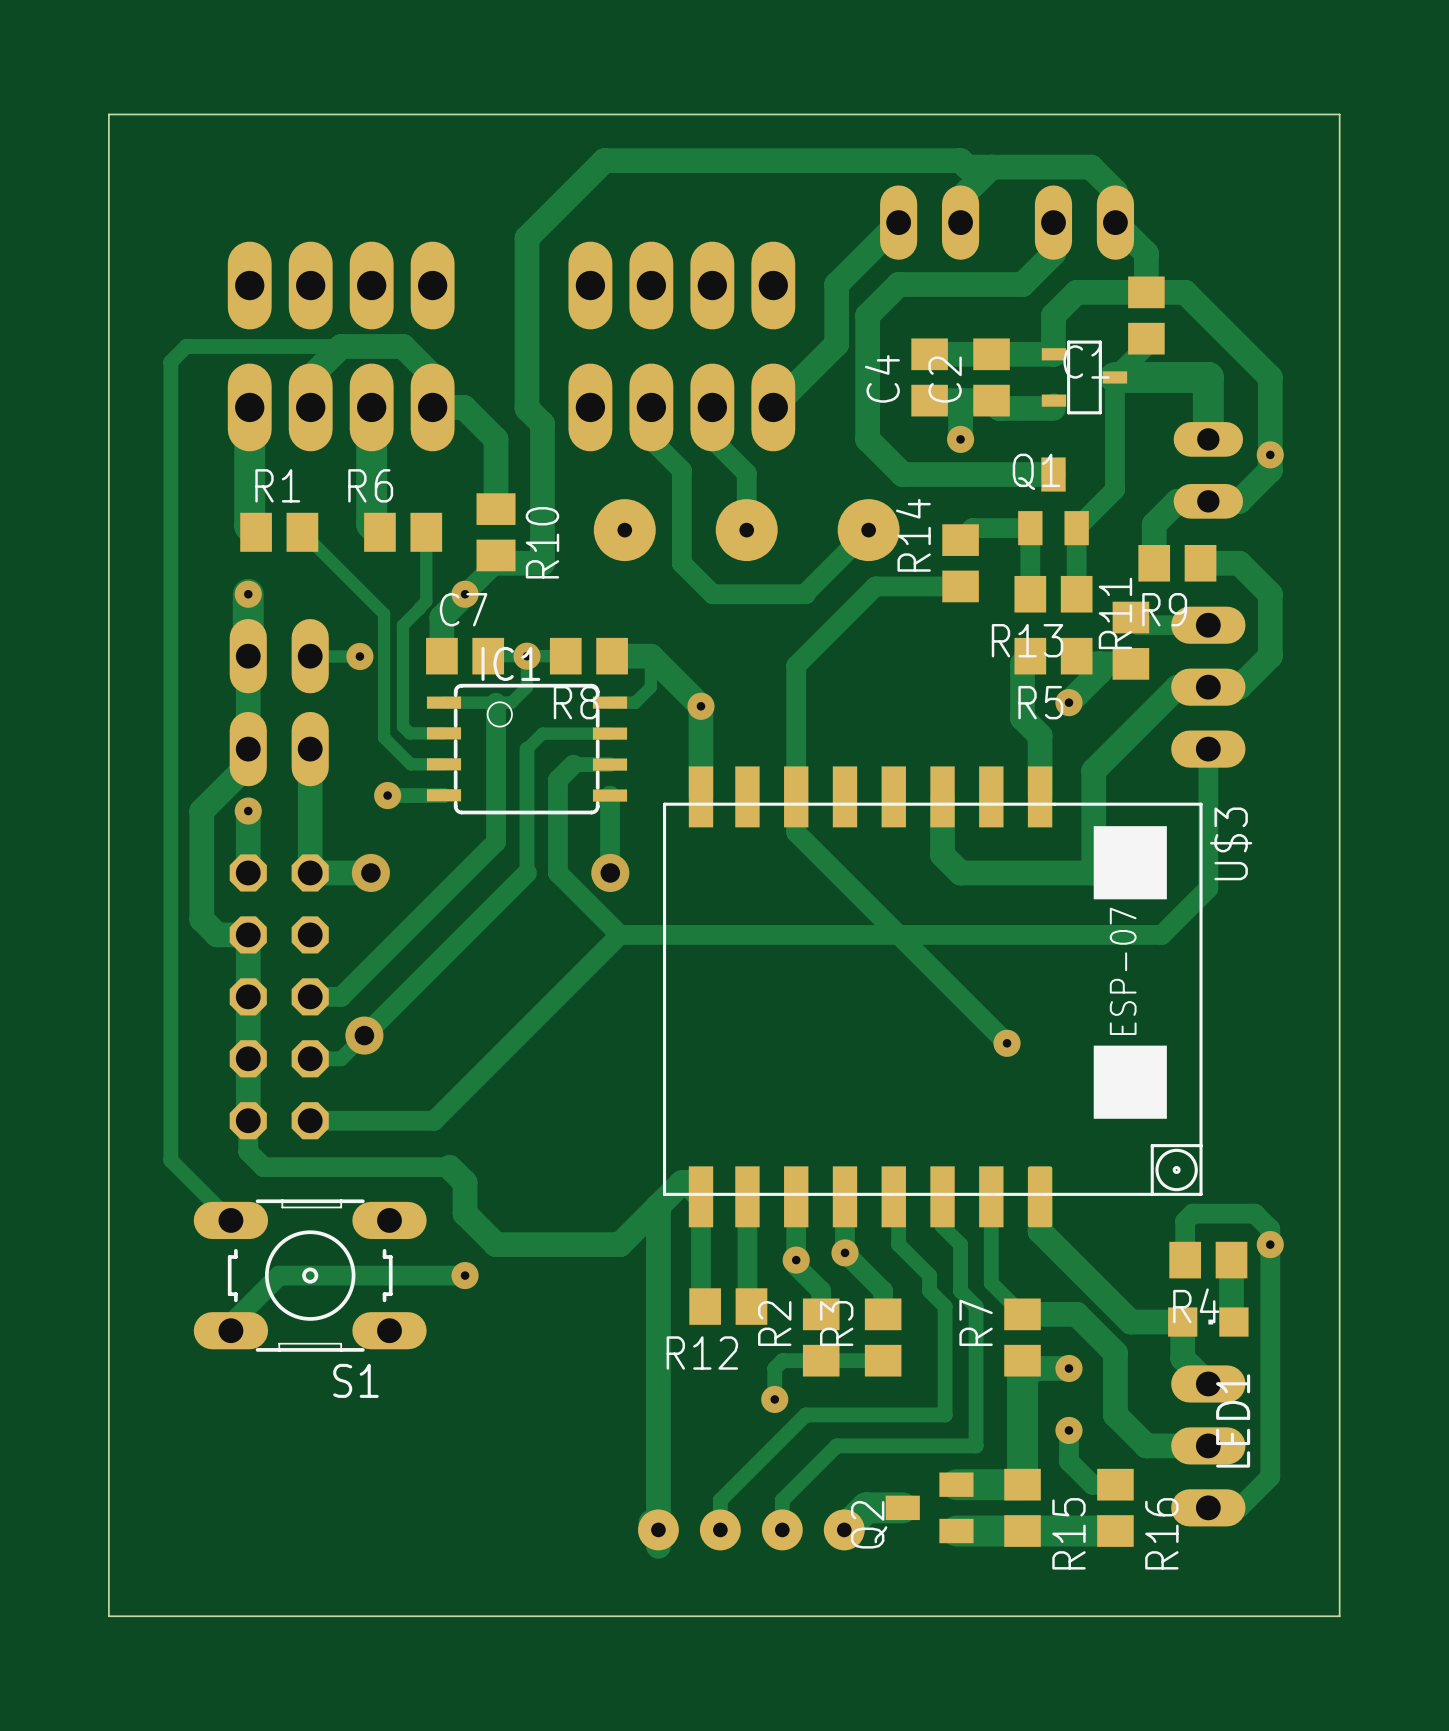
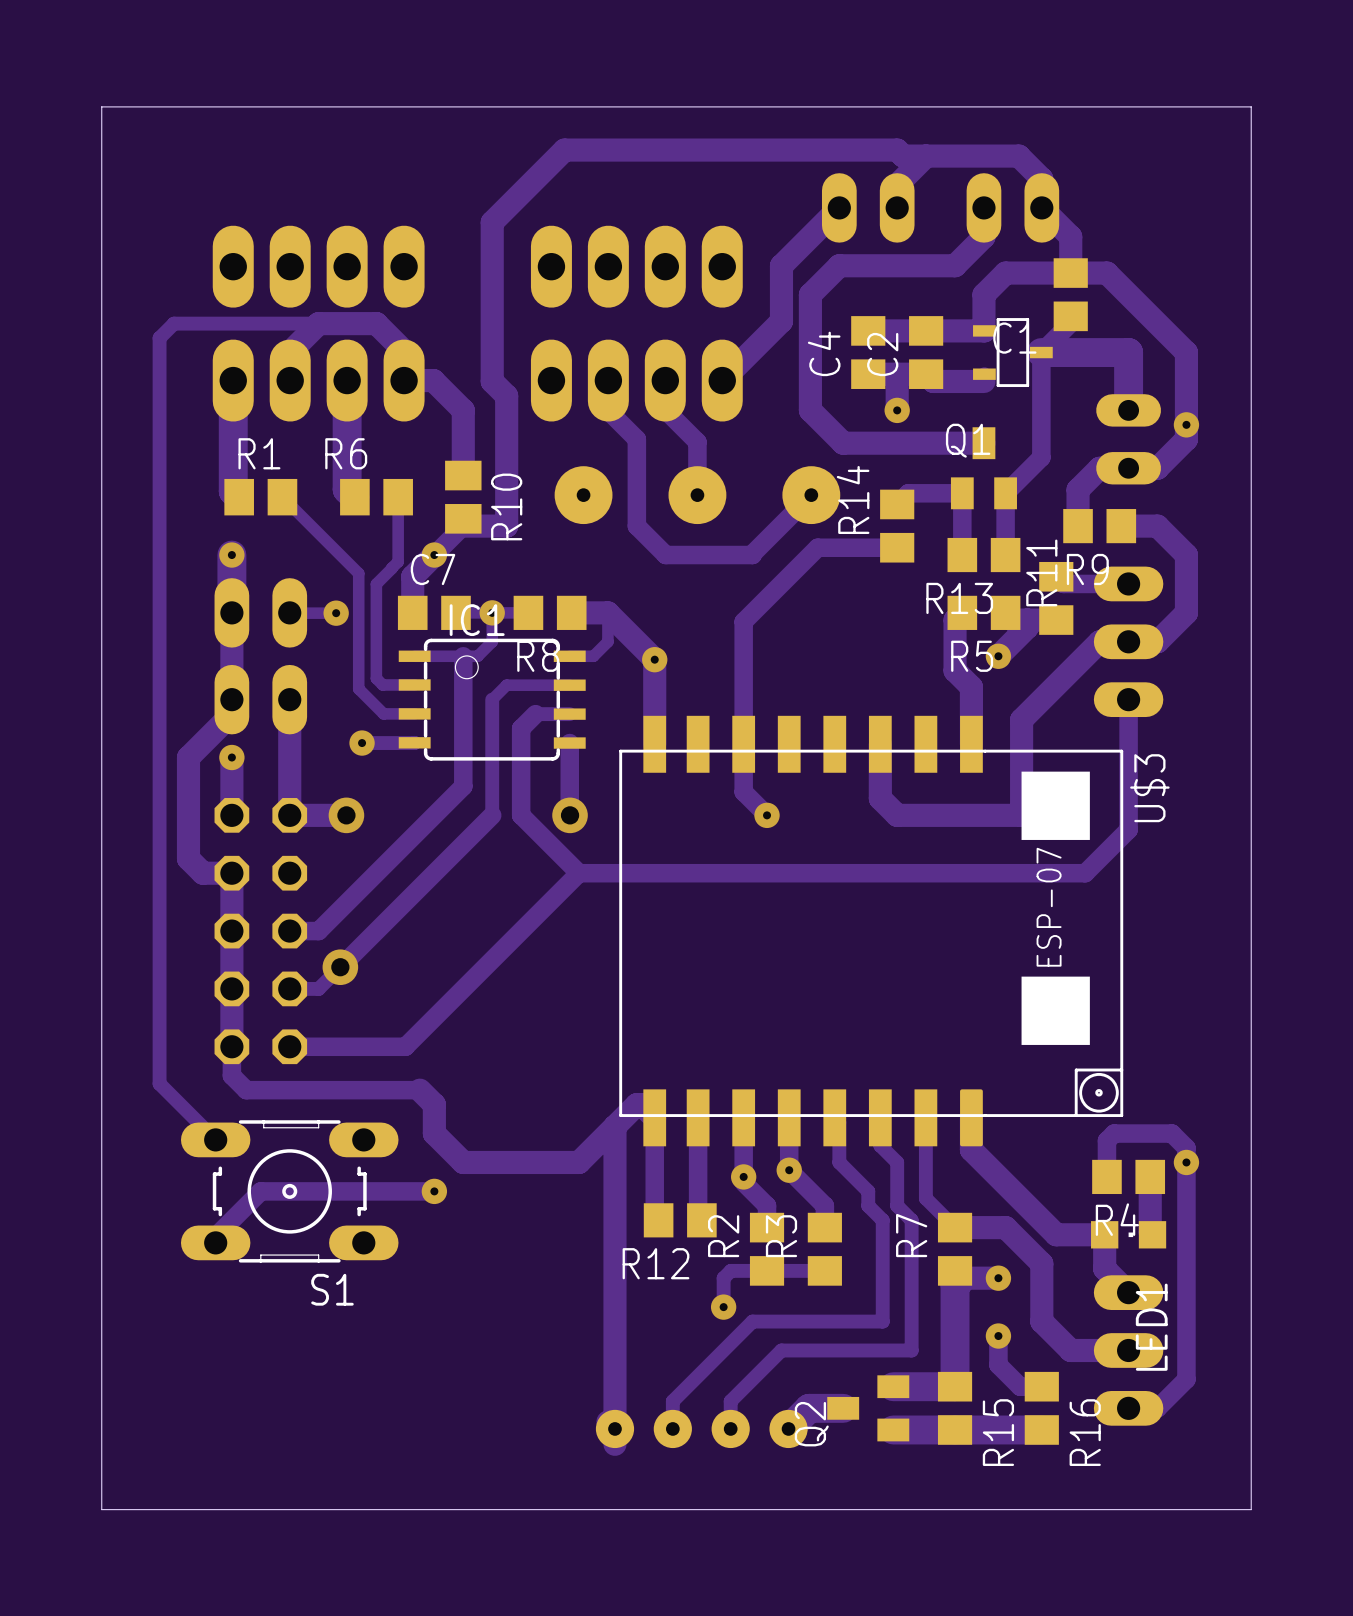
track: (796, 832) (1007, 1043) -> (743, 777) (743, 792) (767, 815)
via: none -> (767, 815)
via: (1007, 1043) -> none

